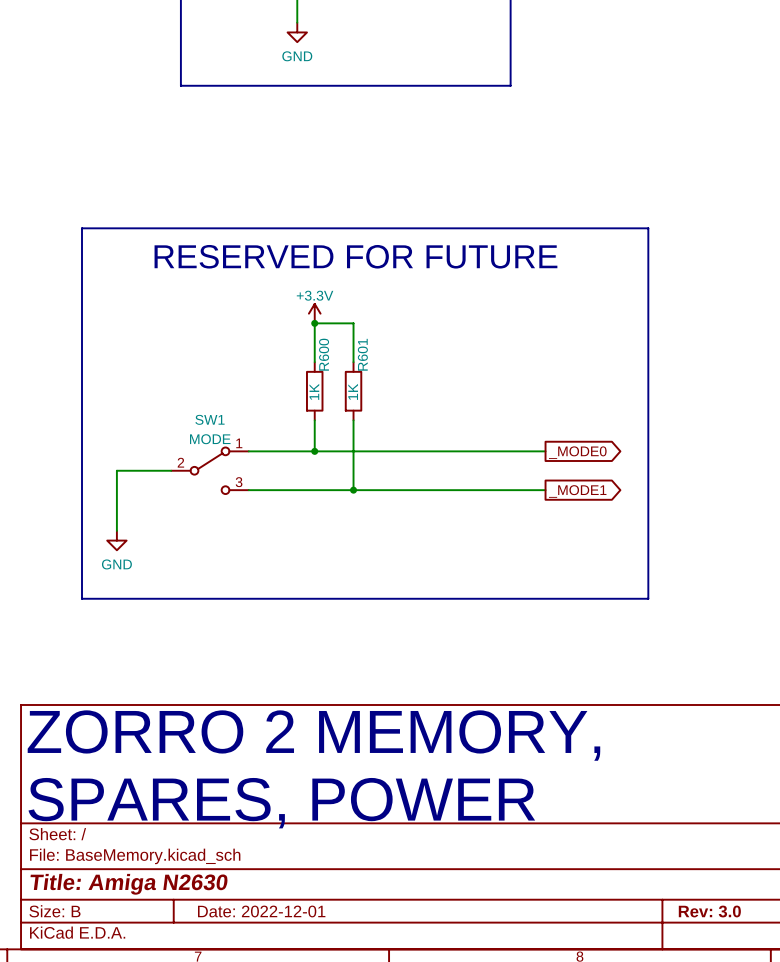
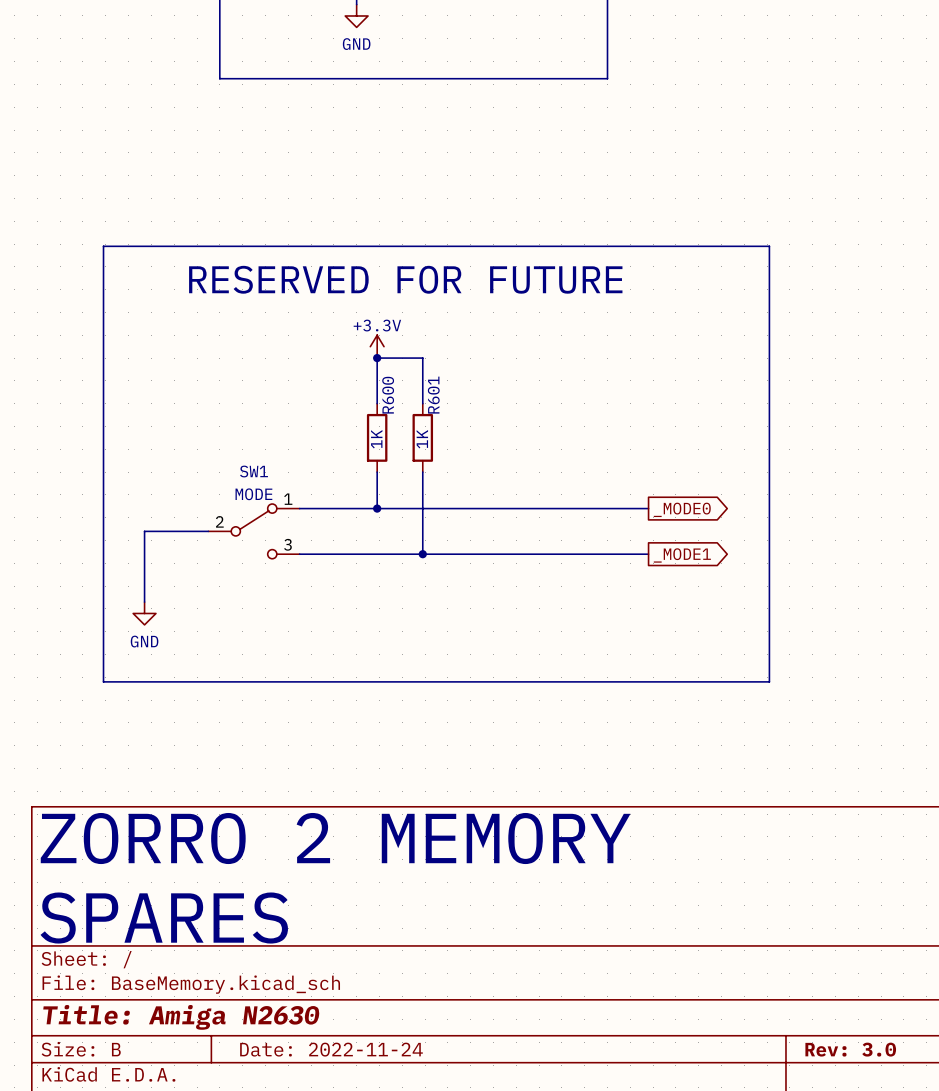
text: ZORRO 2 MEMORY, (313, 735) -> ZORRO 2 MEMORY (335, 838)
text: SPARES, POWER (281, 803) -> SPARES (164, 918)
title block: Date: 2022-12-01 (261, 911) -> Date: 2022-11-24 (331, 1049)

